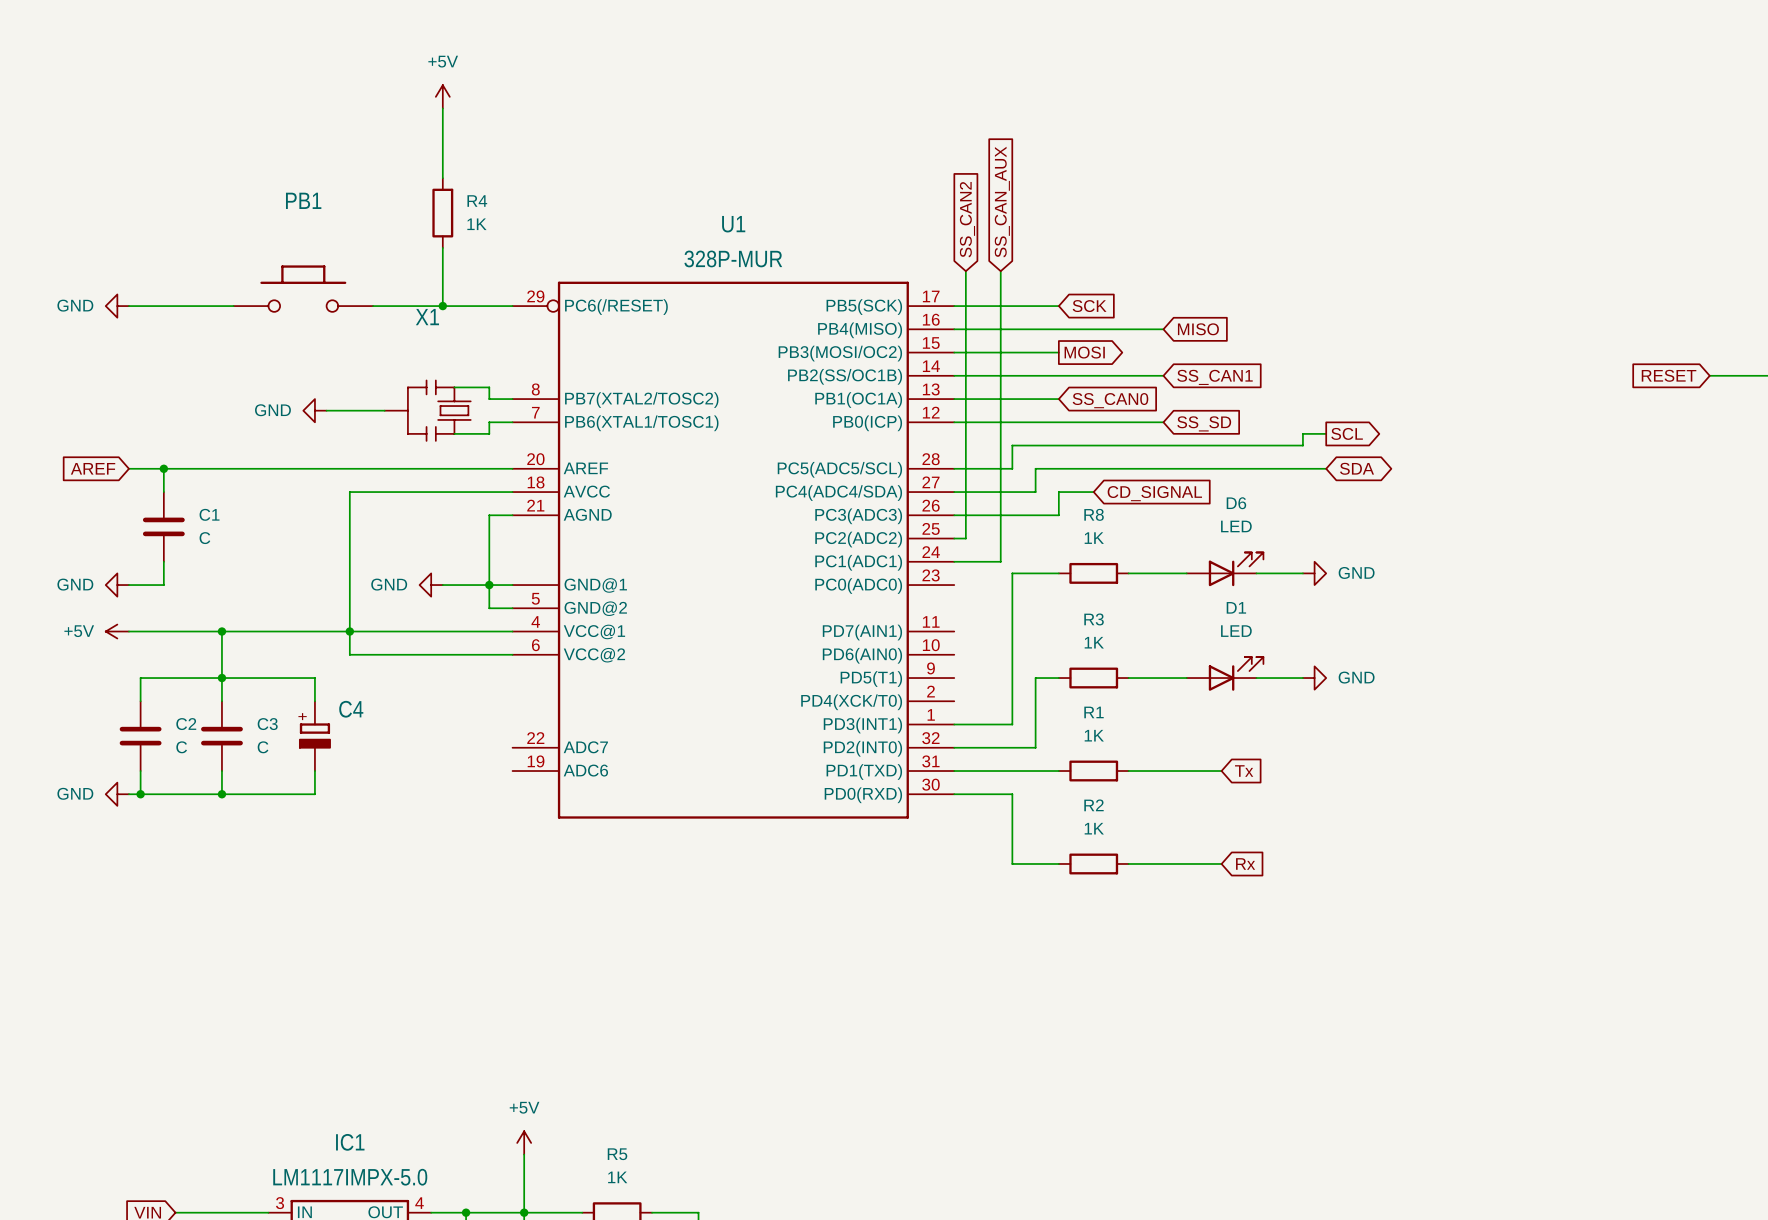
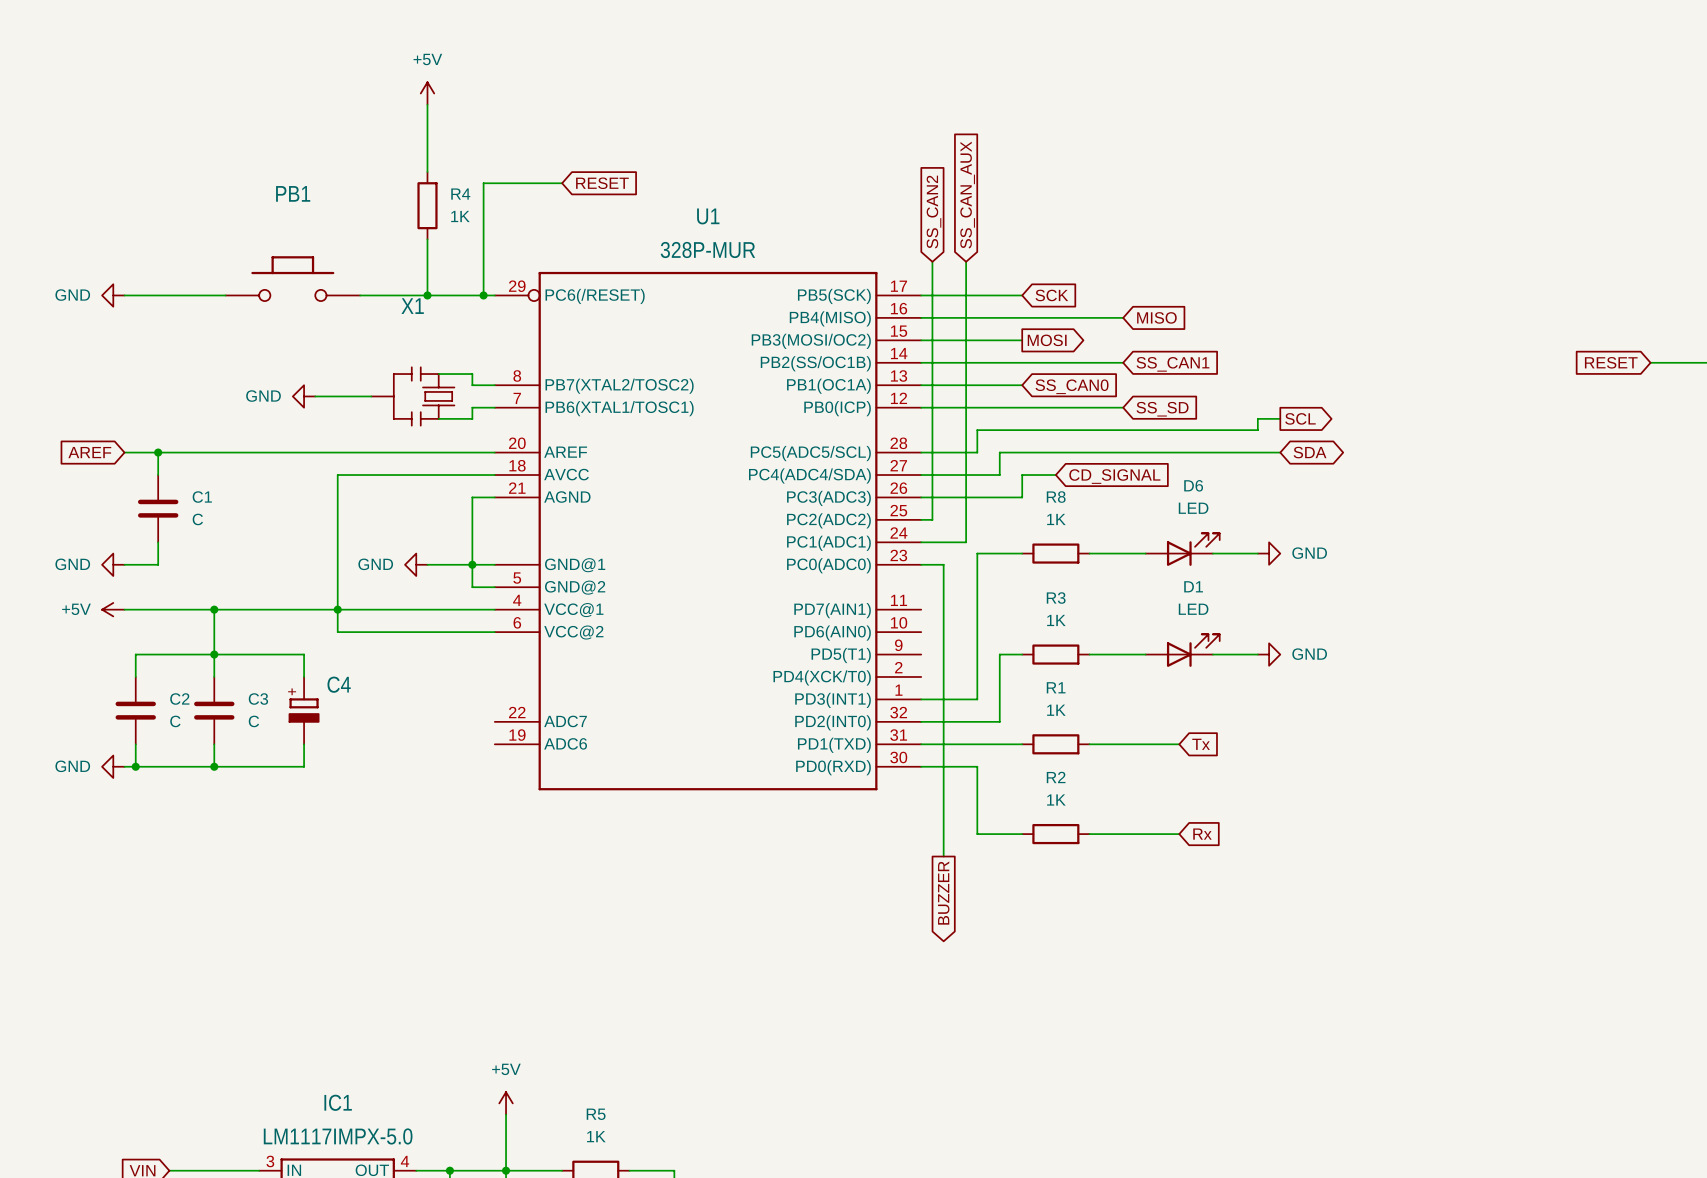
wire: none -> (562, 183) (483, 183) (483, 295)
global label: none -> RESET (602, 183)
junction: none -> (483, 295)
wire: none -> (921, 564) (943, 564) (943, 856)
global label: none -> BUZZER (943, 893)

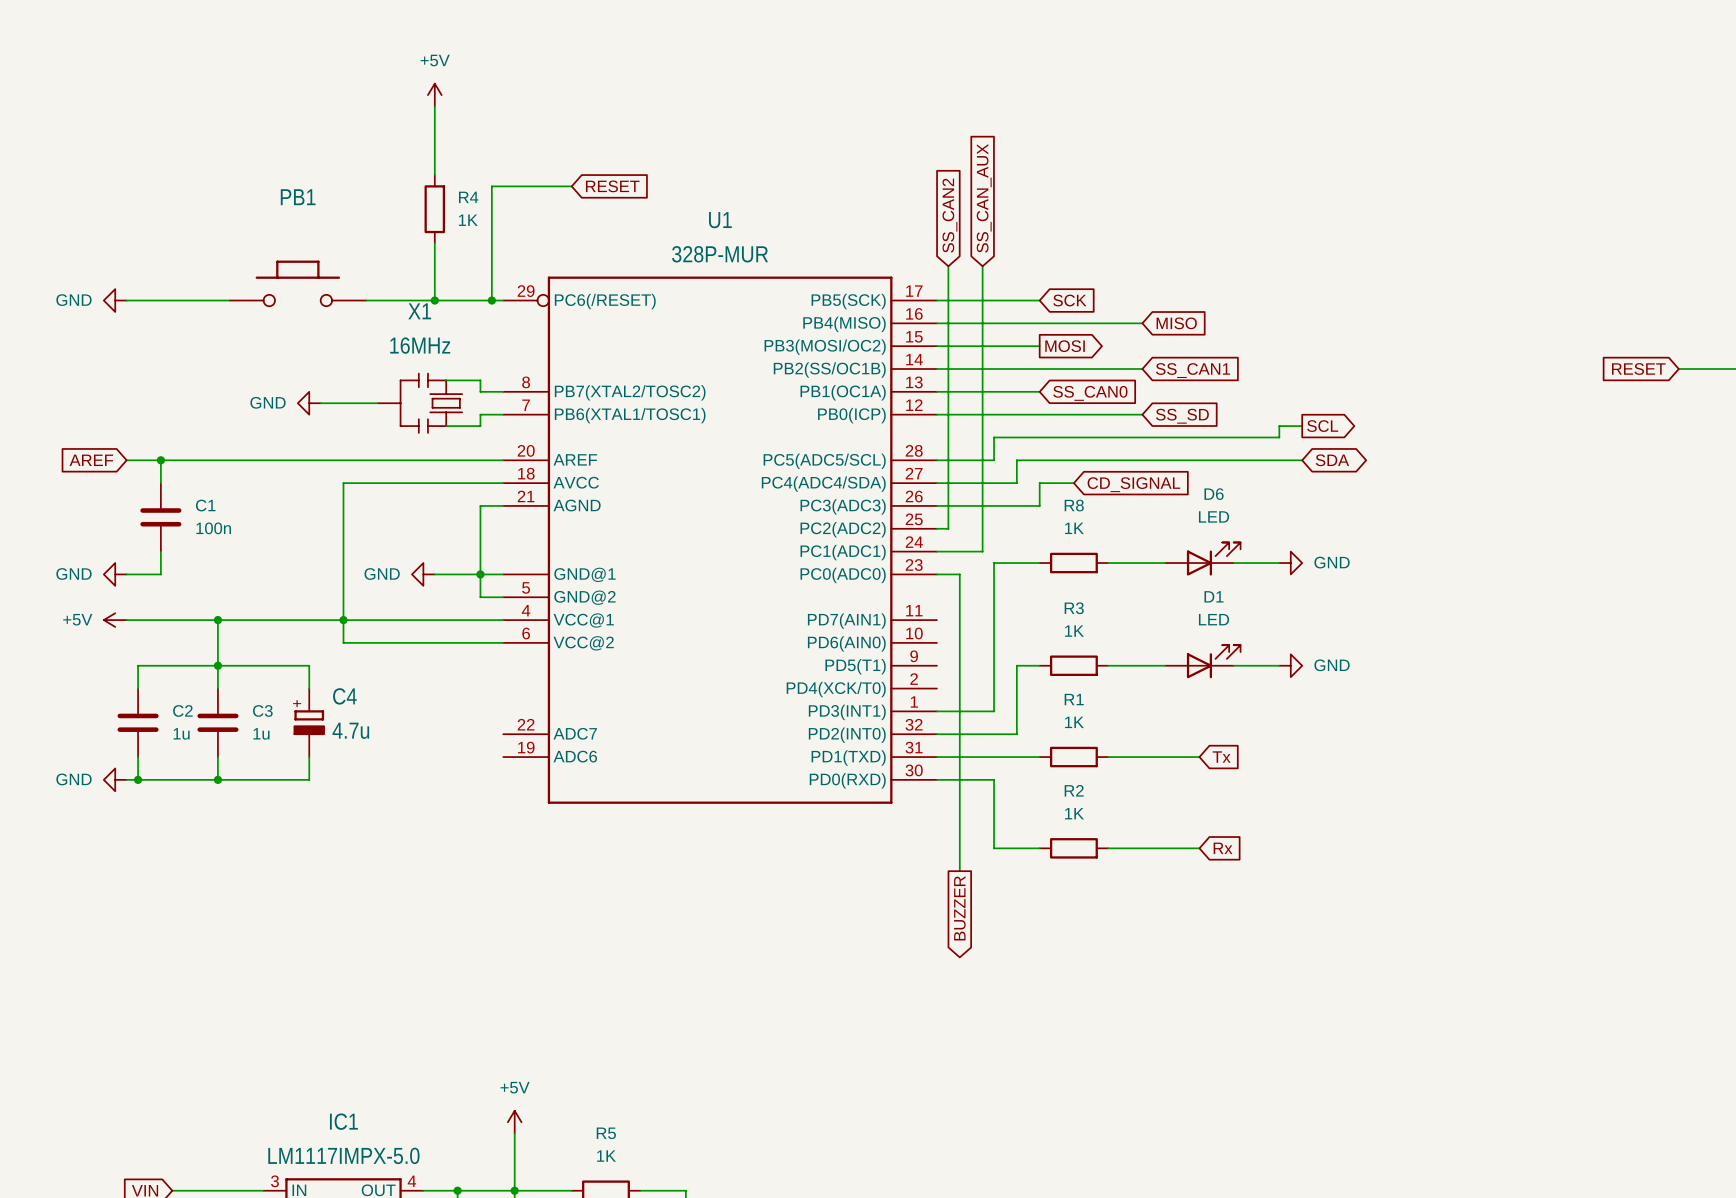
X1 value: none -> 16MHz (420, 345)
C1 value: C (197, 519) -> 100n (213, 528)
C4 value: none -> 4.7u (350, 730)
C2 value: C (175, 721) -> 1u (181, 733)
C3 value: C (253, 721) -> 1u (261, 733)

